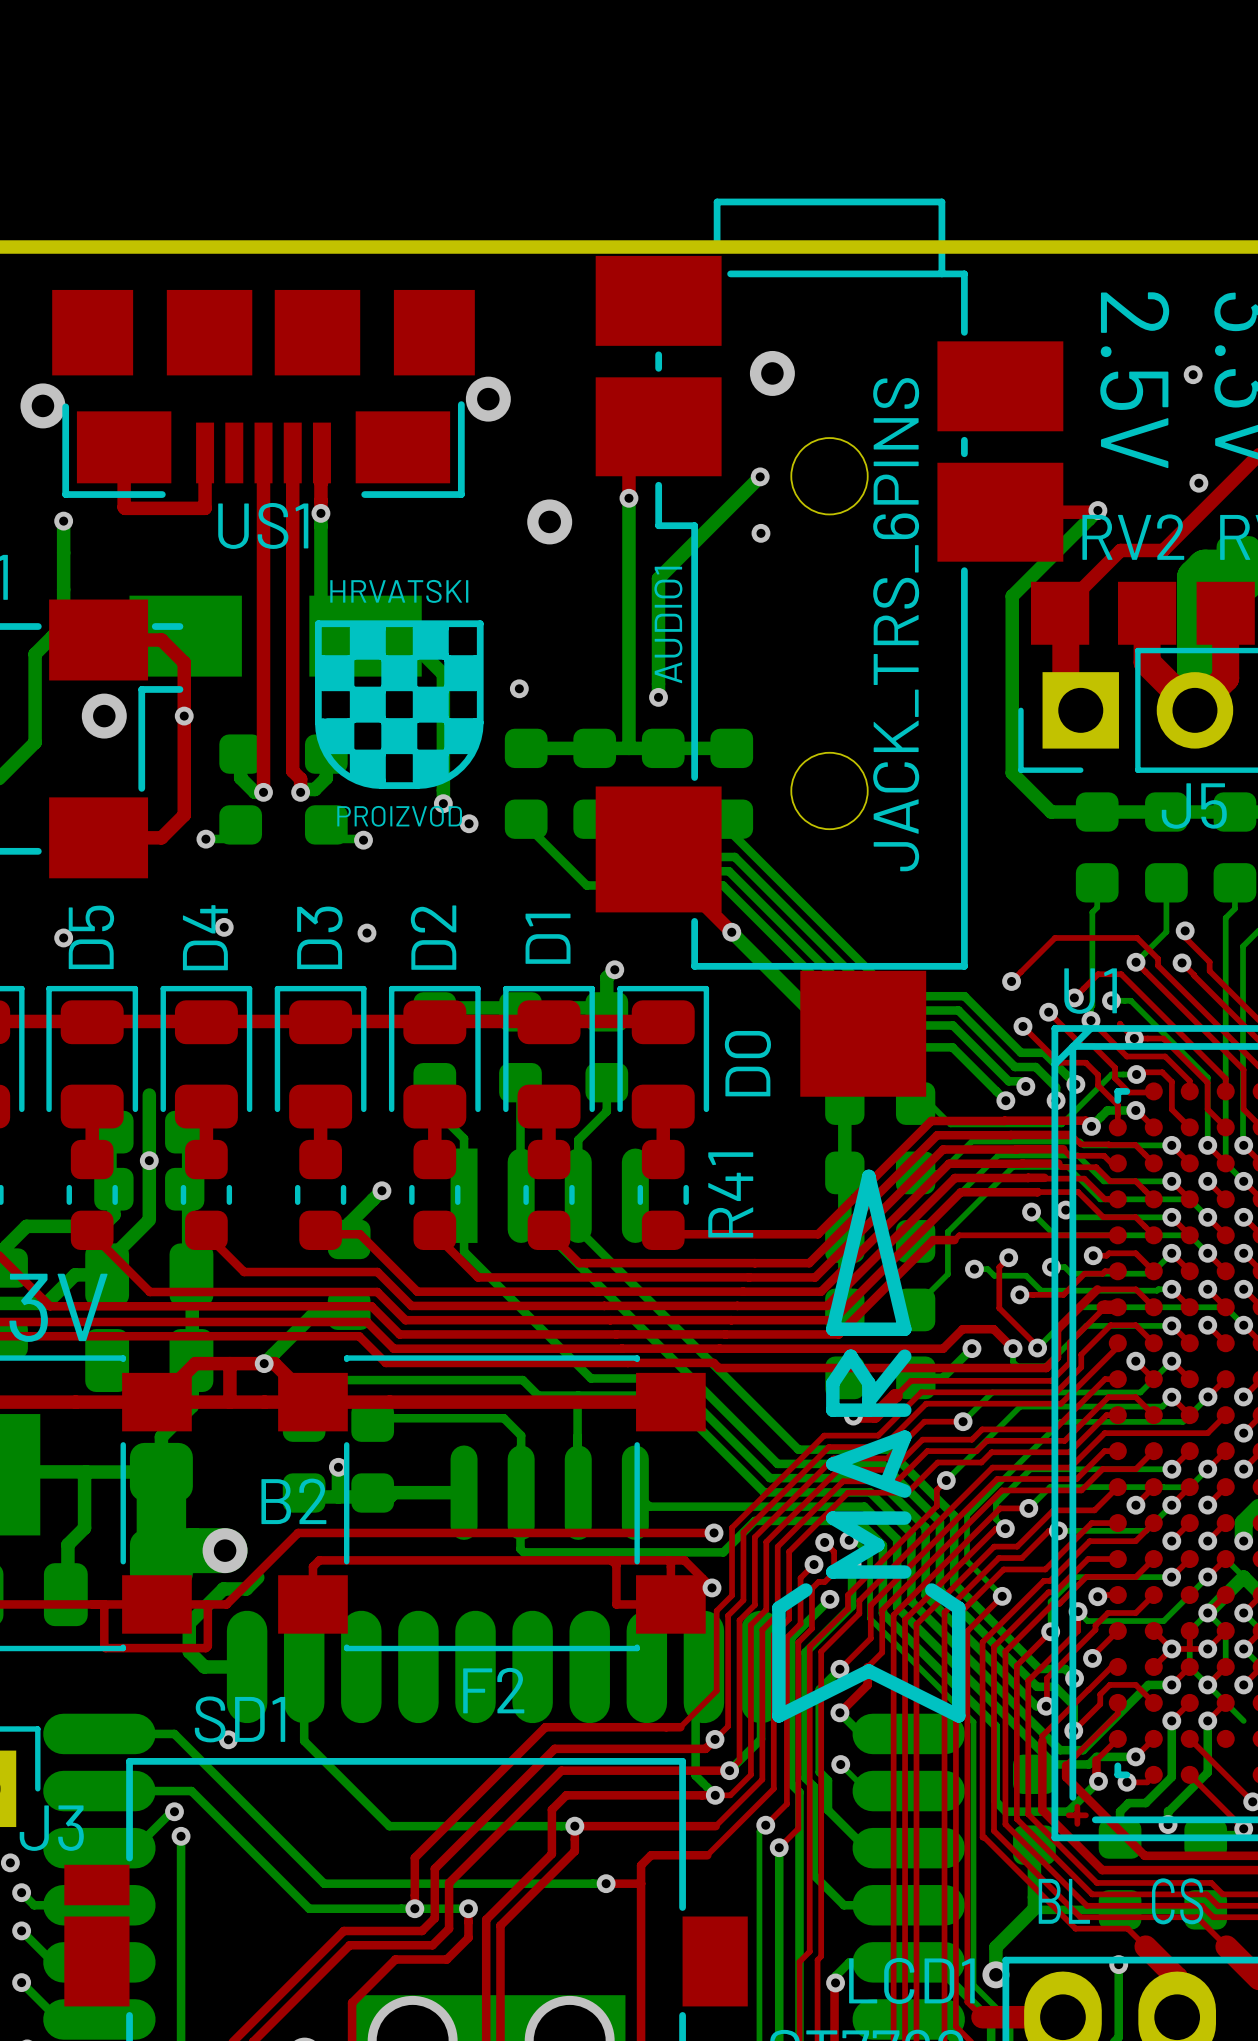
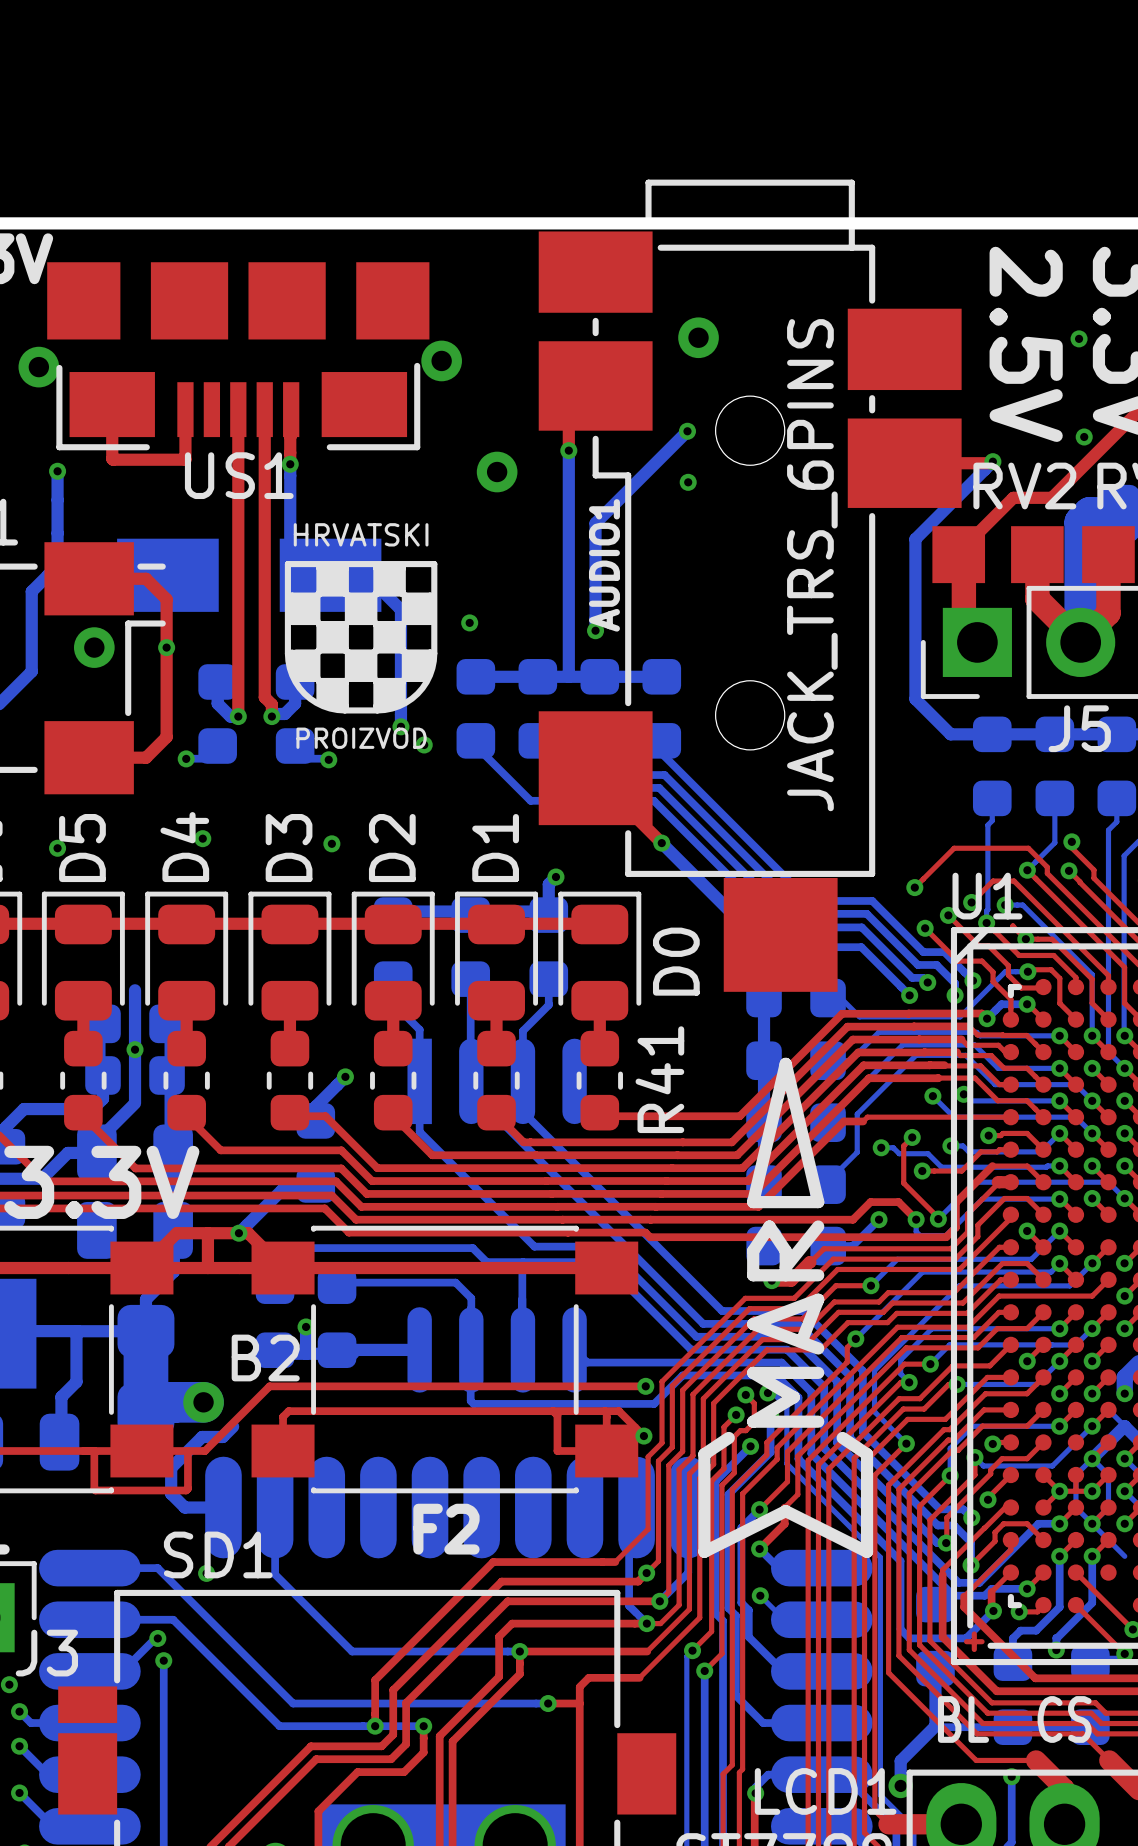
top track: (982, 1837) (1075, 1928) (1127, 1928) (1145, 1946) -> (888, 1661) (888, 1672) (976, 1760) (1036, 1760)

